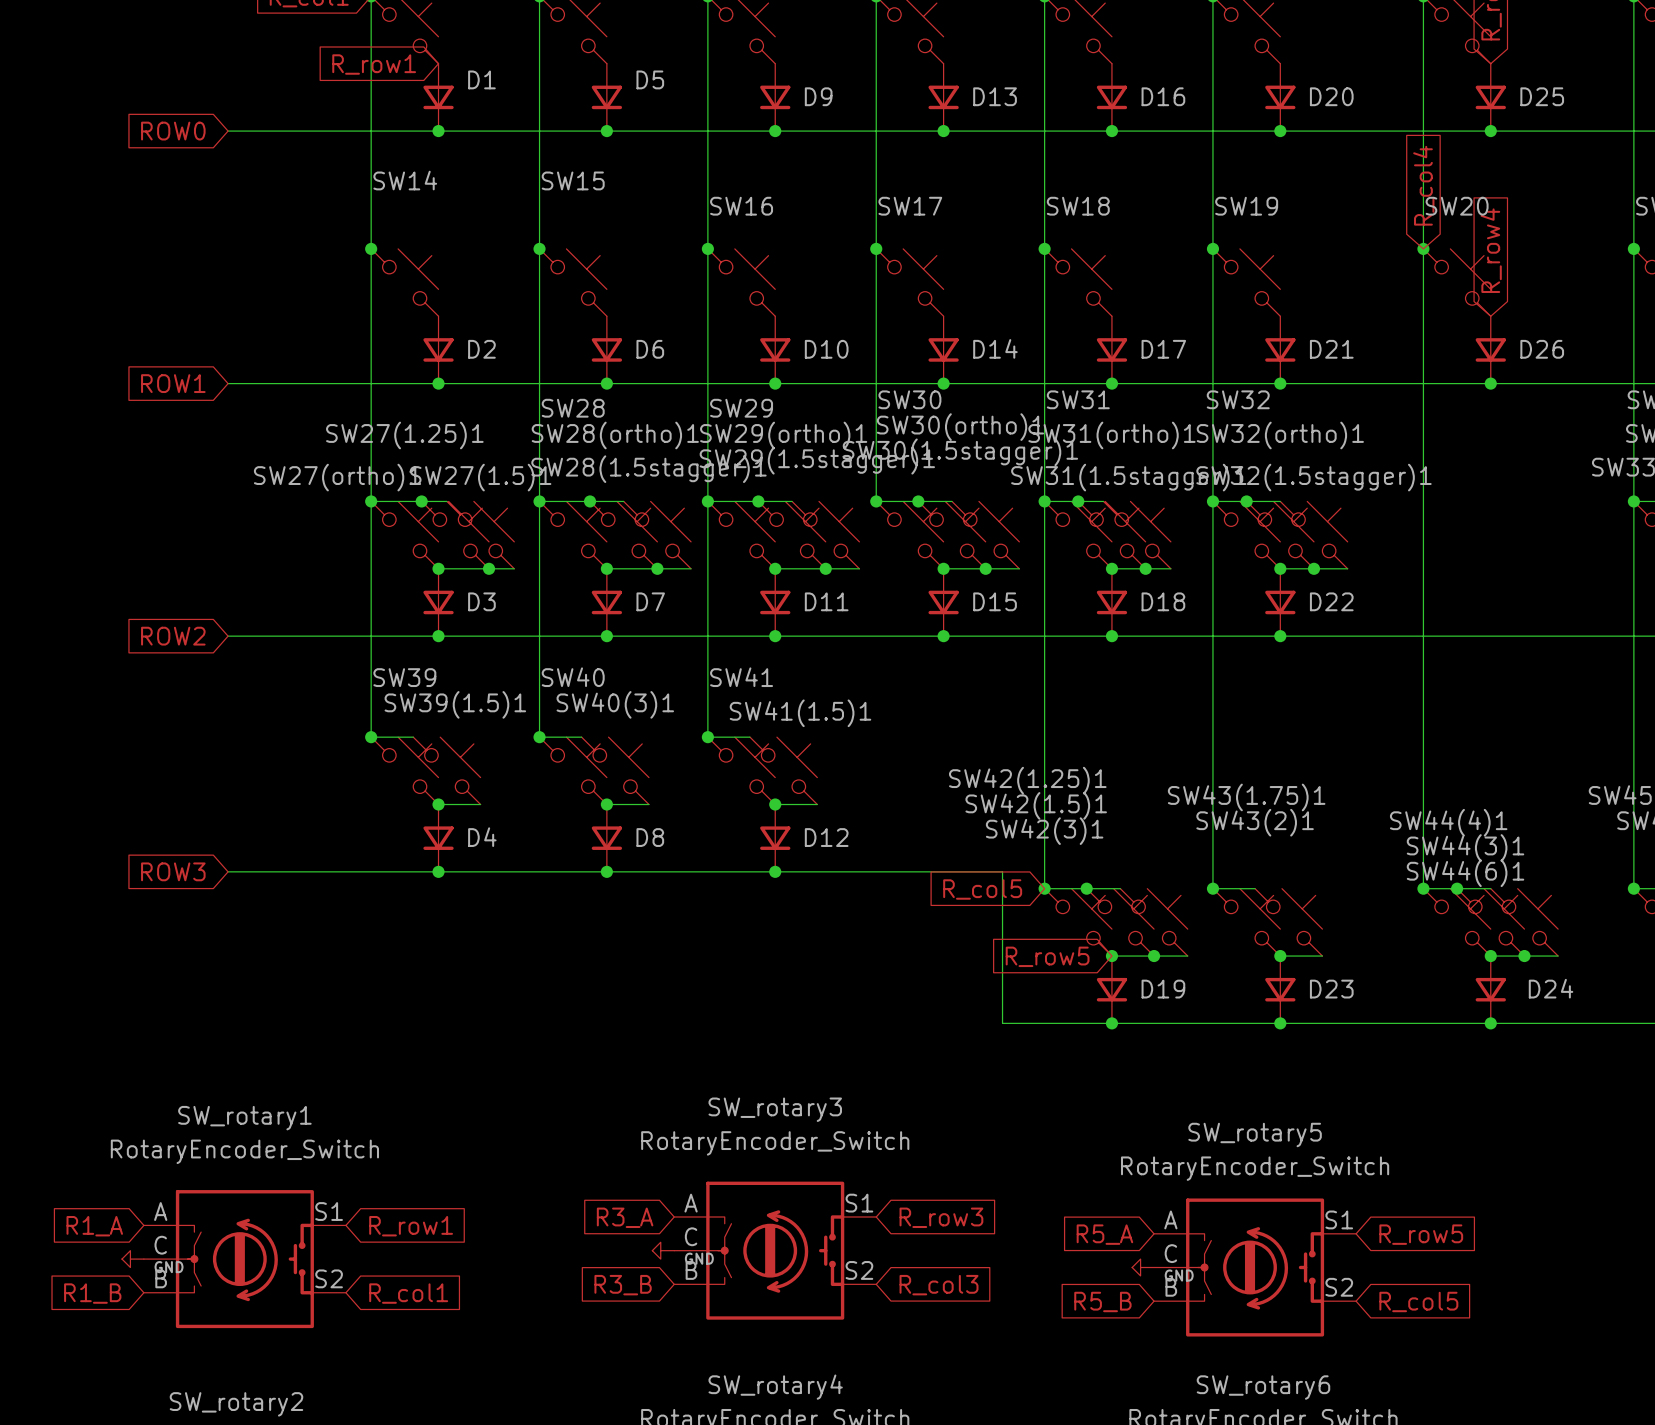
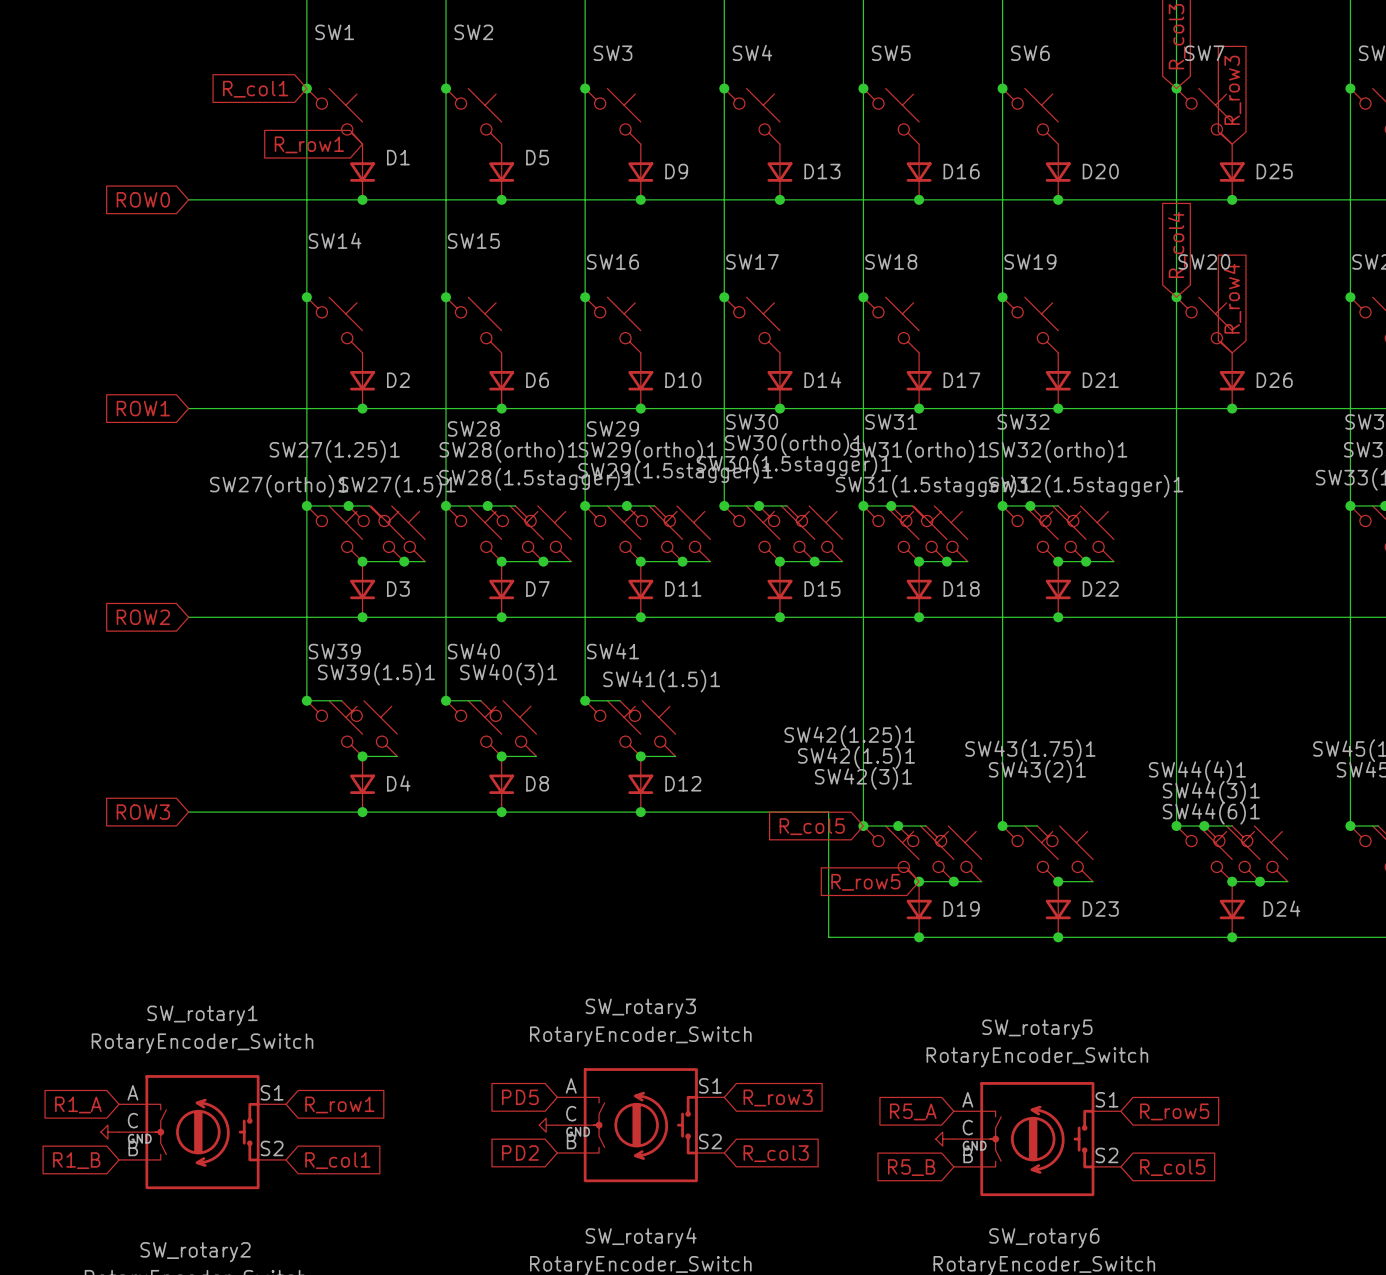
global label: R3_A (625, 1217) -> PD5 (520, 1097)
global label: R3_B (623, 1285) -> PD2 (520, 1152)

